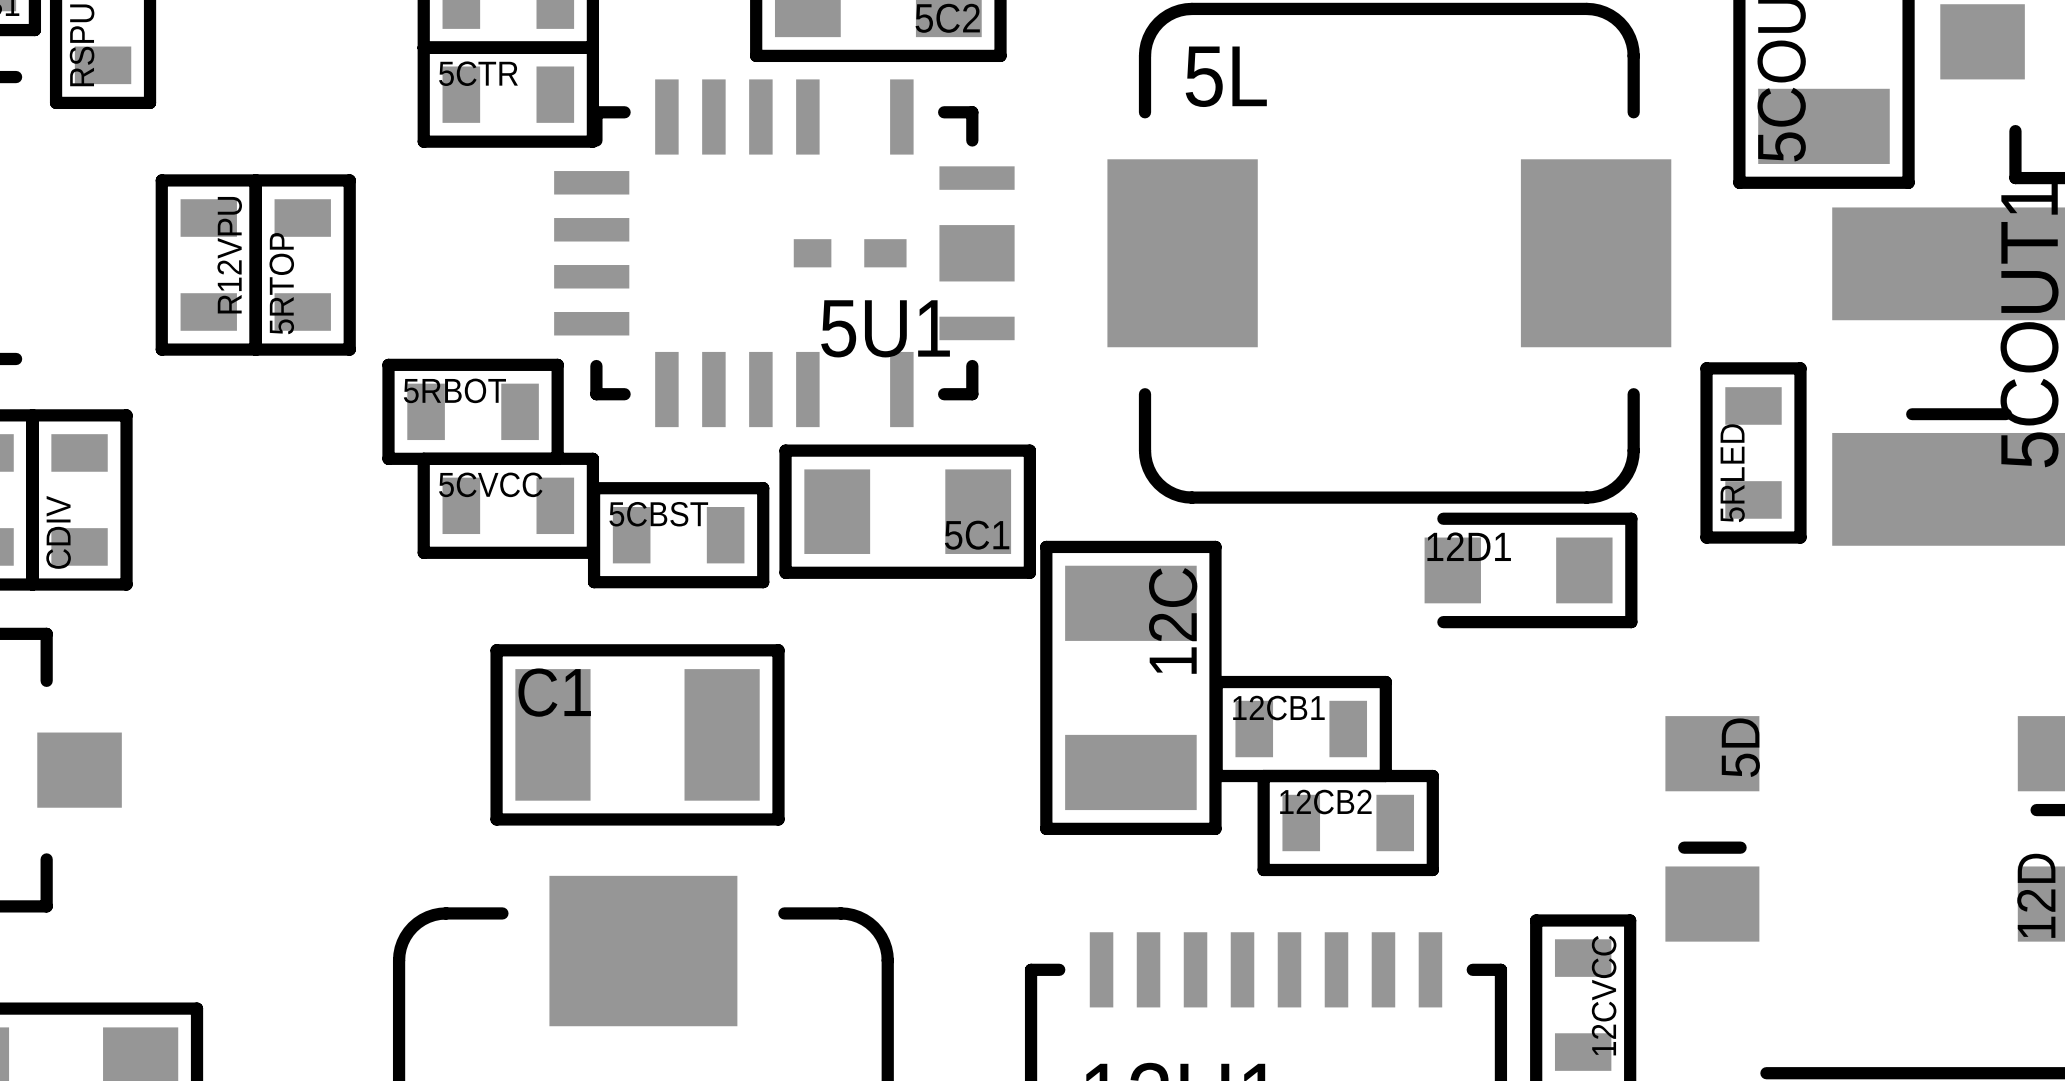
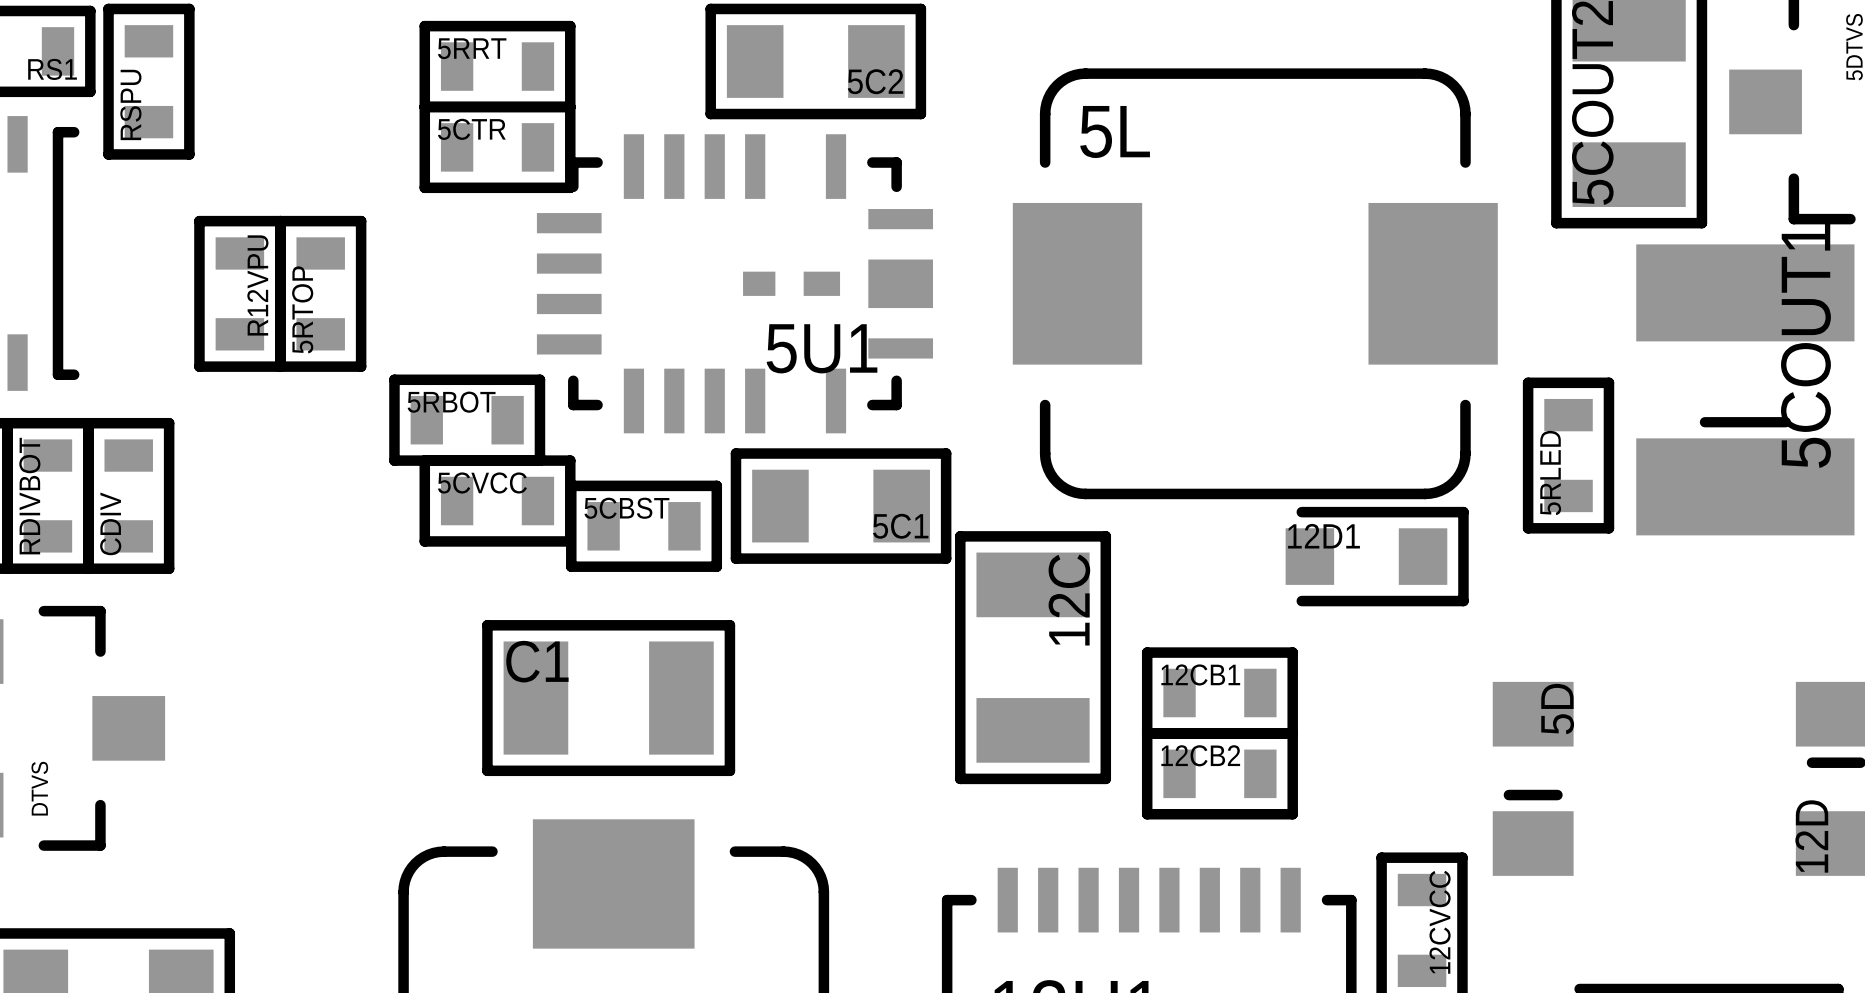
12CB1 position: (1301, 729) -> (1219, 692)

